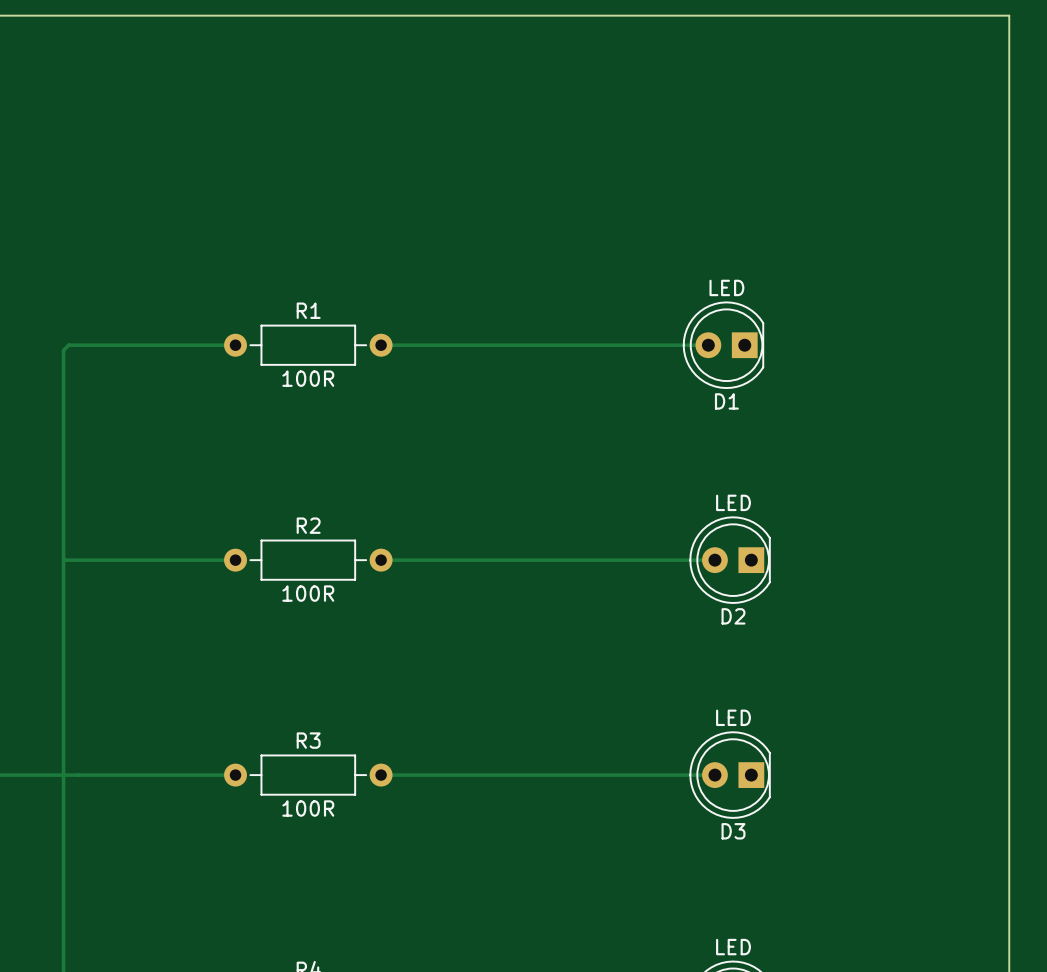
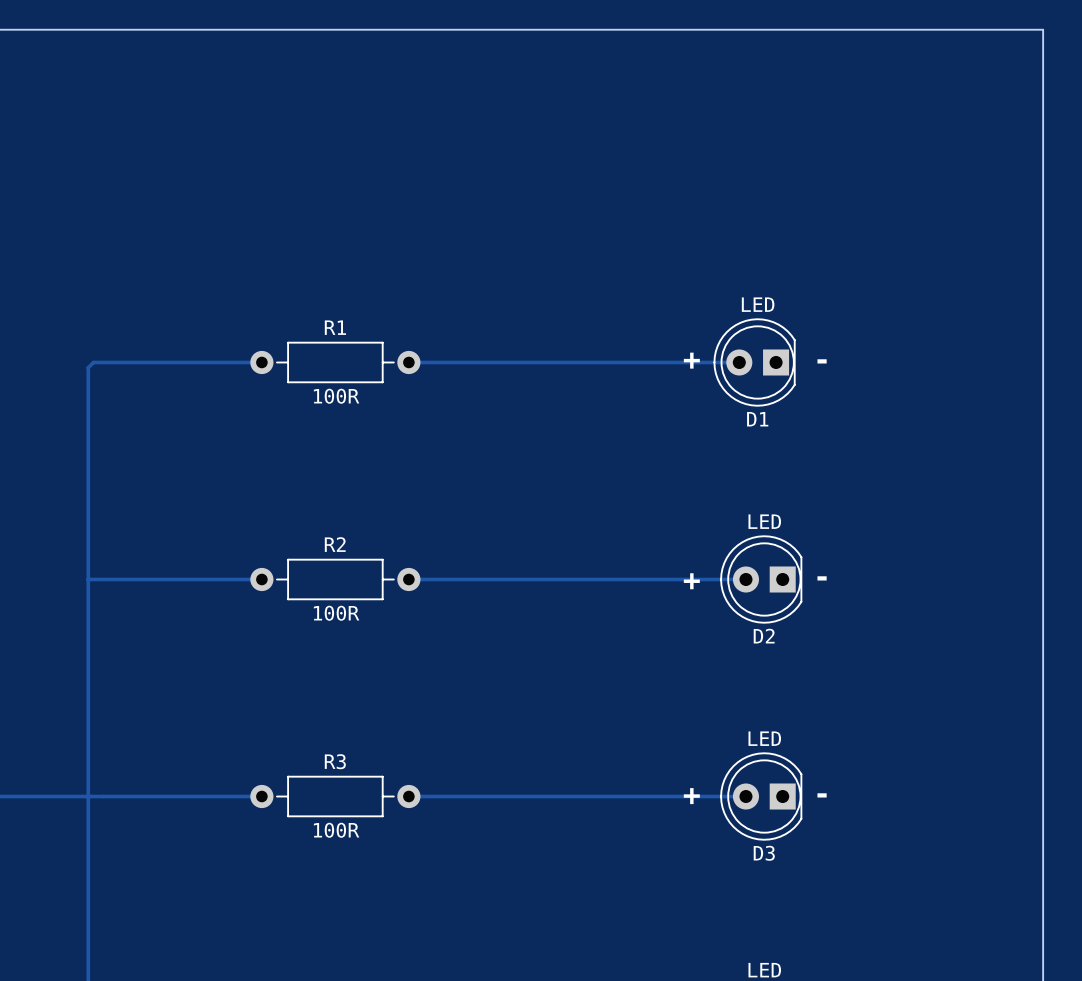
text: none -> + (691, 360)
text: none -> - (822, 361)
text: none -> - (822, 578)
text: none -> + (691, 581)
text: none -> - (822, 795)
text: none -> + (691, 796)

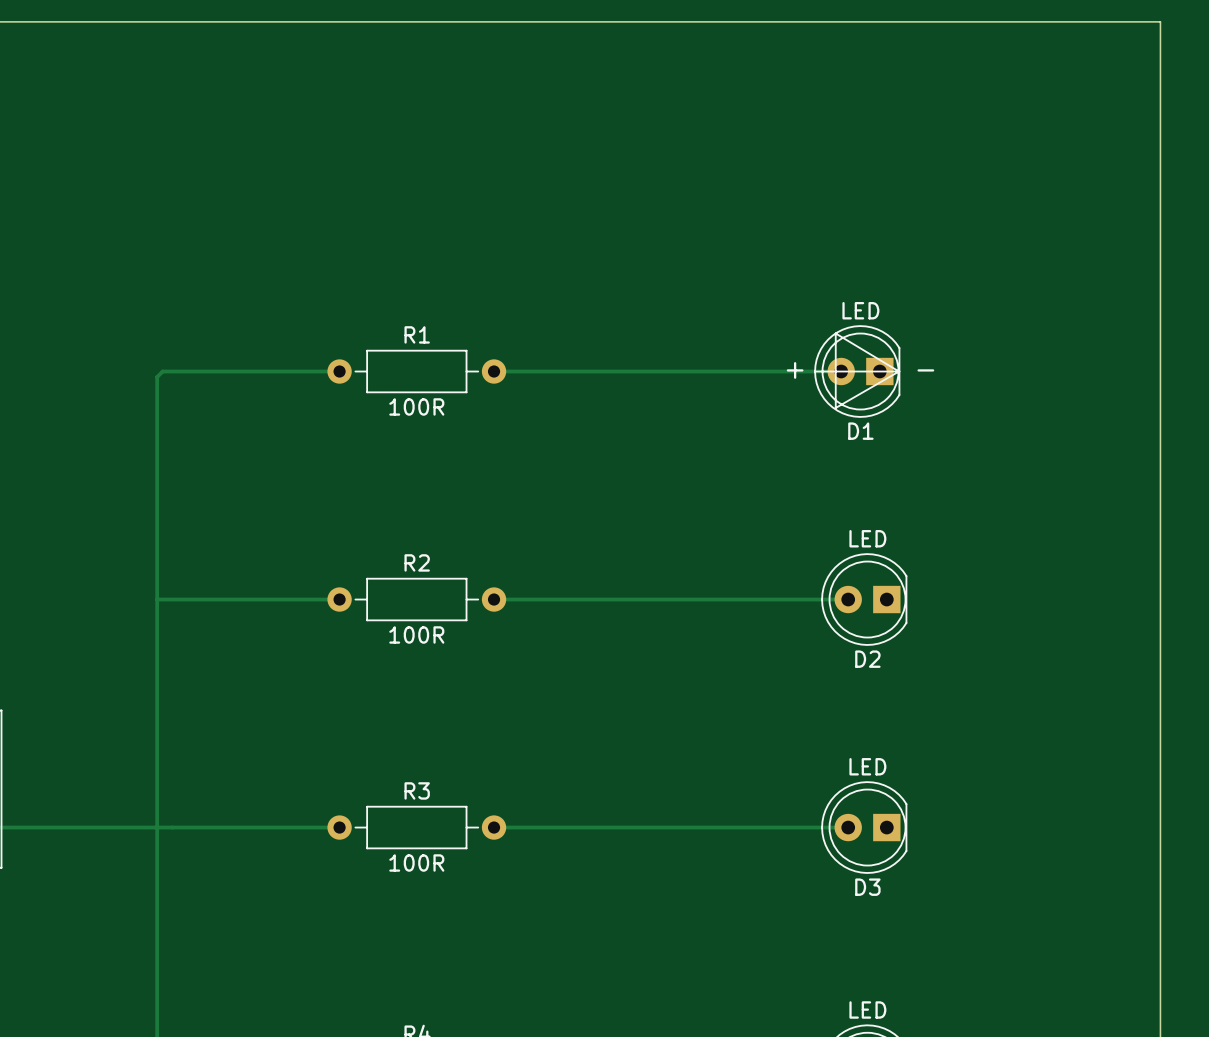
D1 footprint: [713, 318, 796, 407] -> [814, 325, 901, 418]
text: + (691, 360) -> none
text: - (822, 361) -> none
text: - (822, 578) -> none
text: + (691, 581) -> none
text: - (822, 795) -> none
text: + (691, 796) -> none

